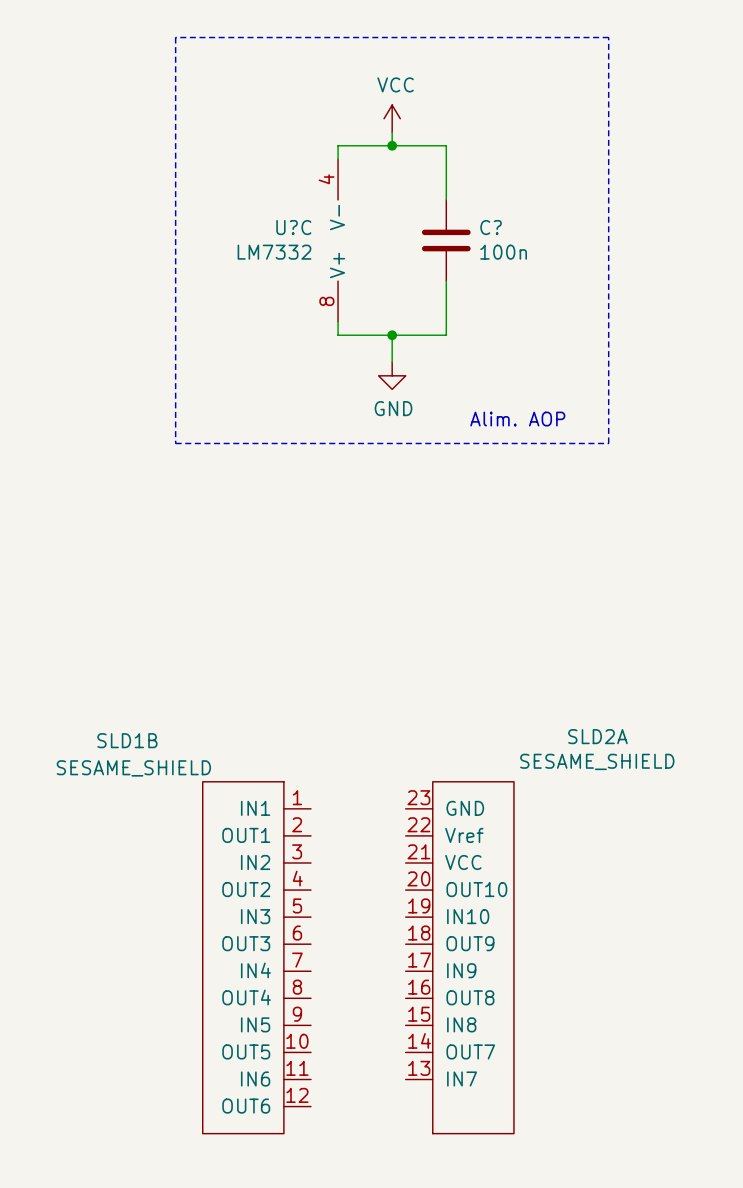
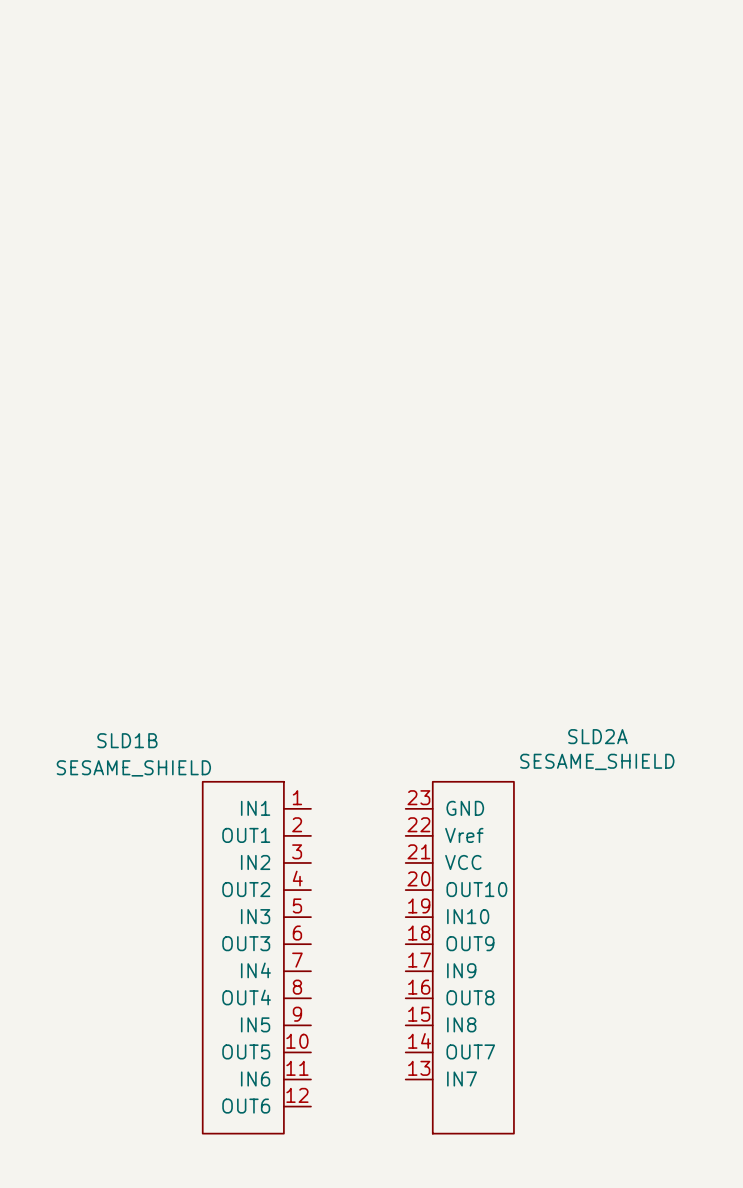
line: (175, 37) (175, 443) (608, 443) (608, 37) (175, 37) -> none
power symbol: VCC (392, 118) -> none
wire: (392, 132) (392, 145) -> none
junction: (392, 145) -> none
wire: (338, 159) (338, 145) (446, 145) (446, 199) -> none
U?C: LM7332 (338, 240) -> none
C?: 100n (446, 240) -> none
wire: (446, 281) (446, 335) (338, 335) (338, 321) -> none
wire: (392, 335) (392, 362) -> none
junction: (392, 335) -> none
power symbol: GND (392, 375) -> none
text: Alim. AOP (517, 419) -> none

